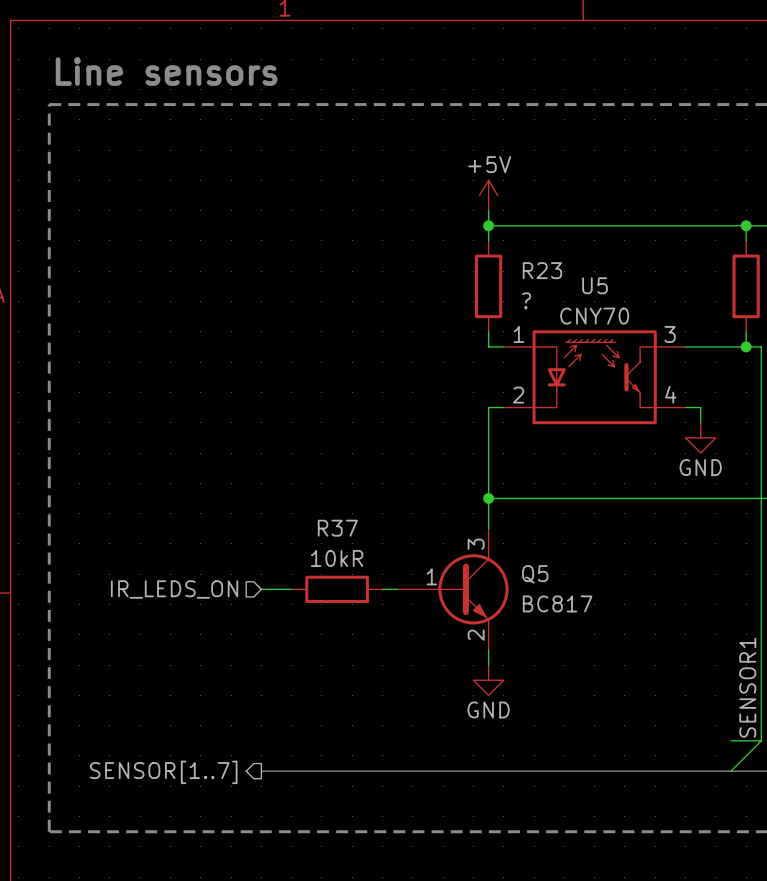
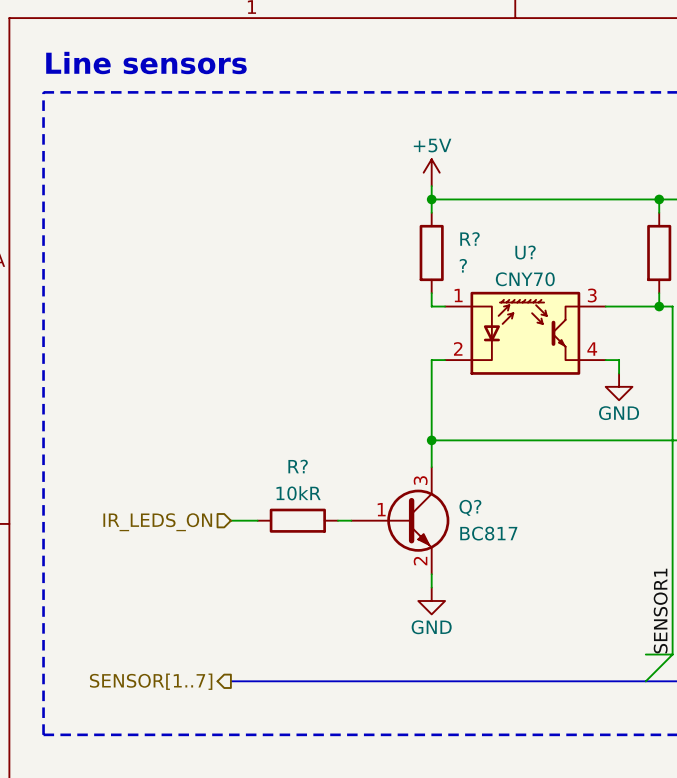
R23 name: R23 (542, 270) -> R? (469, 238)
U5 name: U5 (595, 285) -> U? (525, 252)
R37 name: R37 (337, 528) -> R? (298, 466)
Q5 name: Q5 (535, 574) -> Q? (470, 507)

